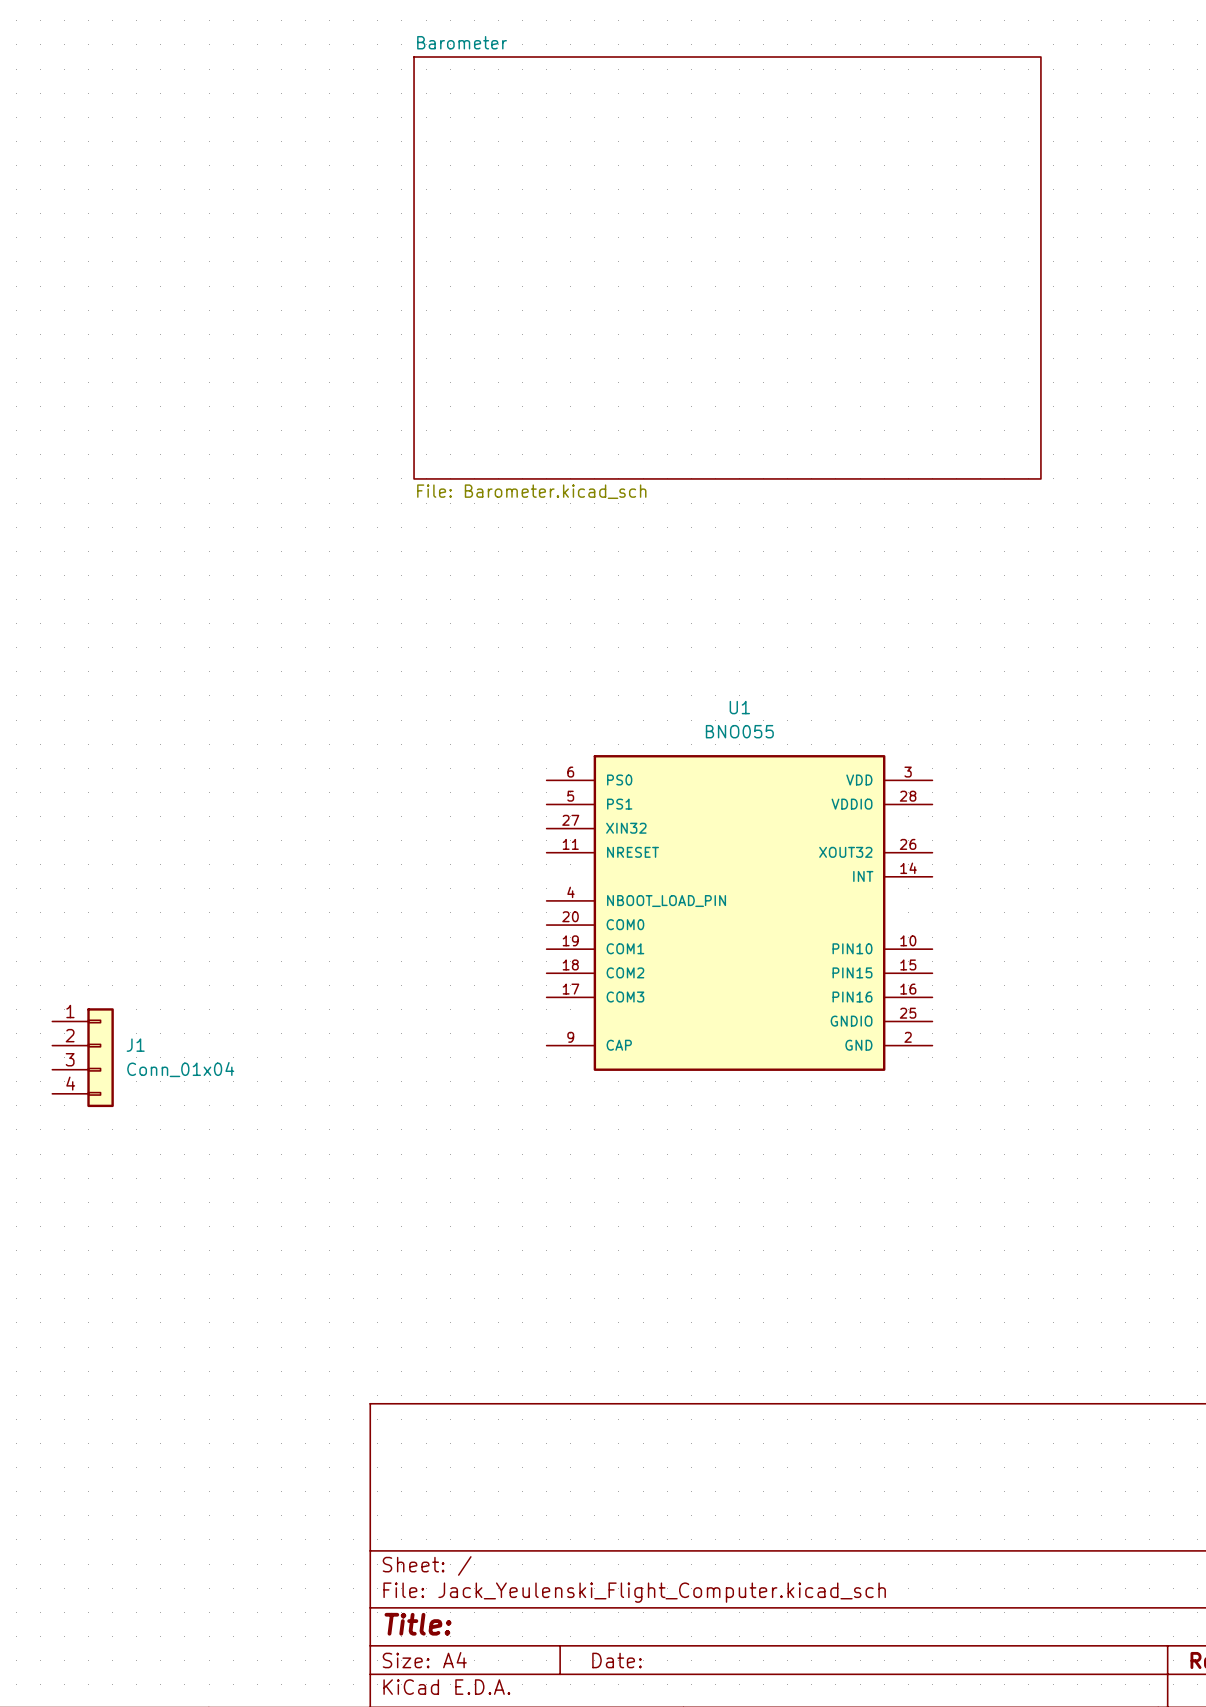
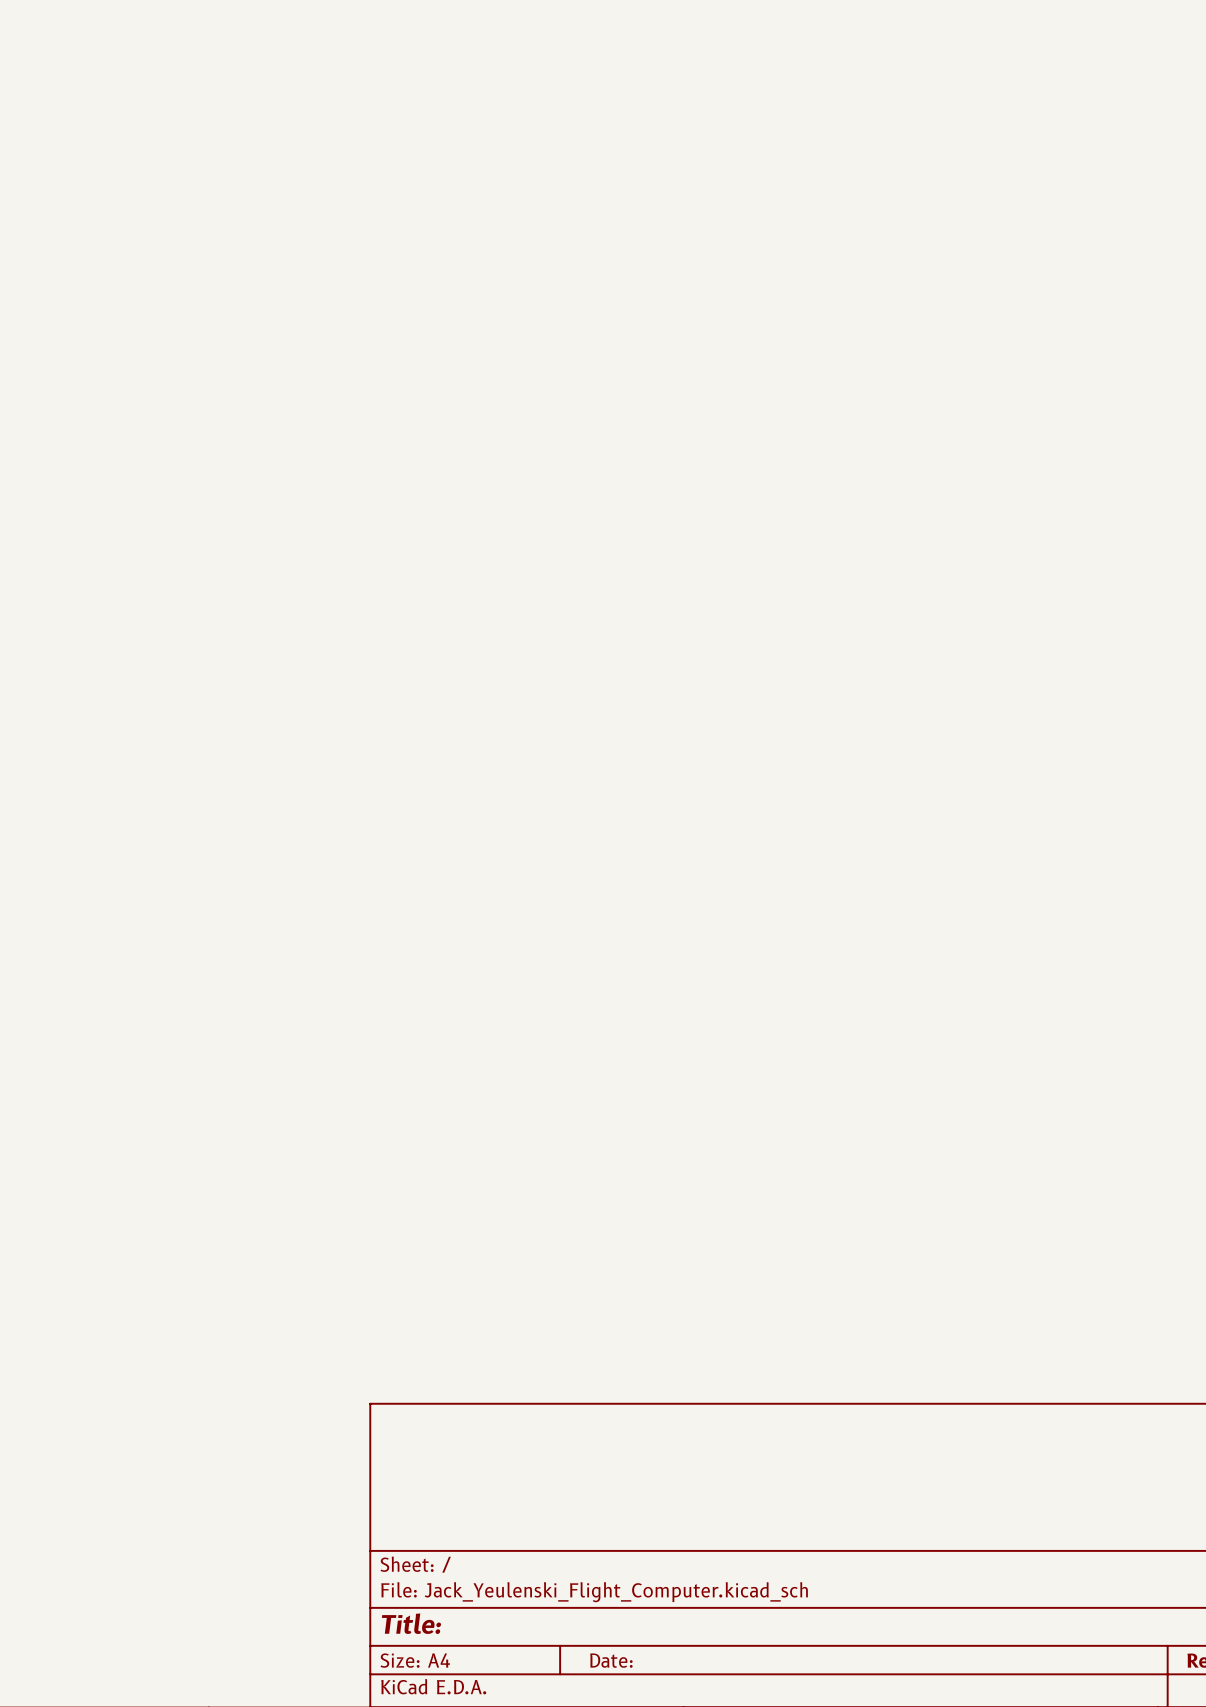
sheet Barometer: File: Barometer.kicad_sch (727, 267) -> none
U1: BNO055 (739, 912) -> none
J1: Conn_01x04 (83, 1057) -> none

